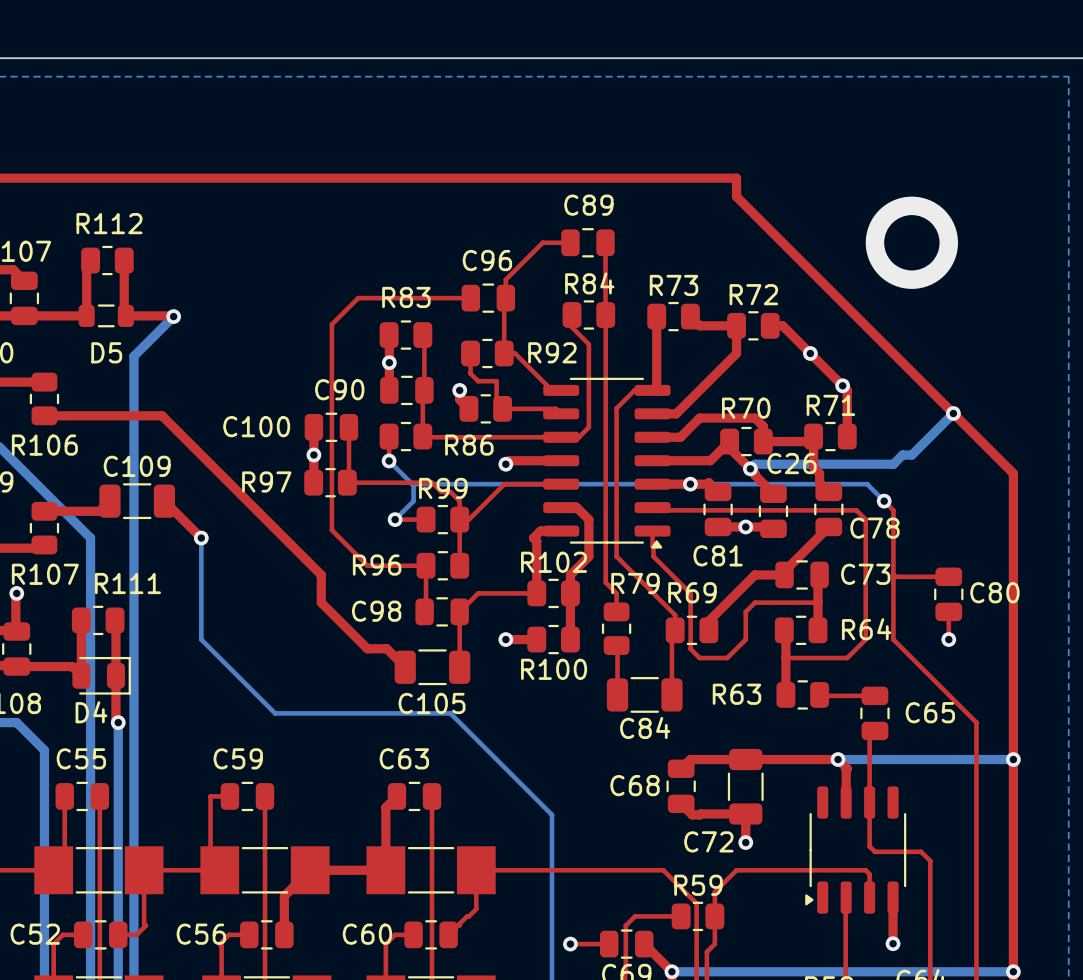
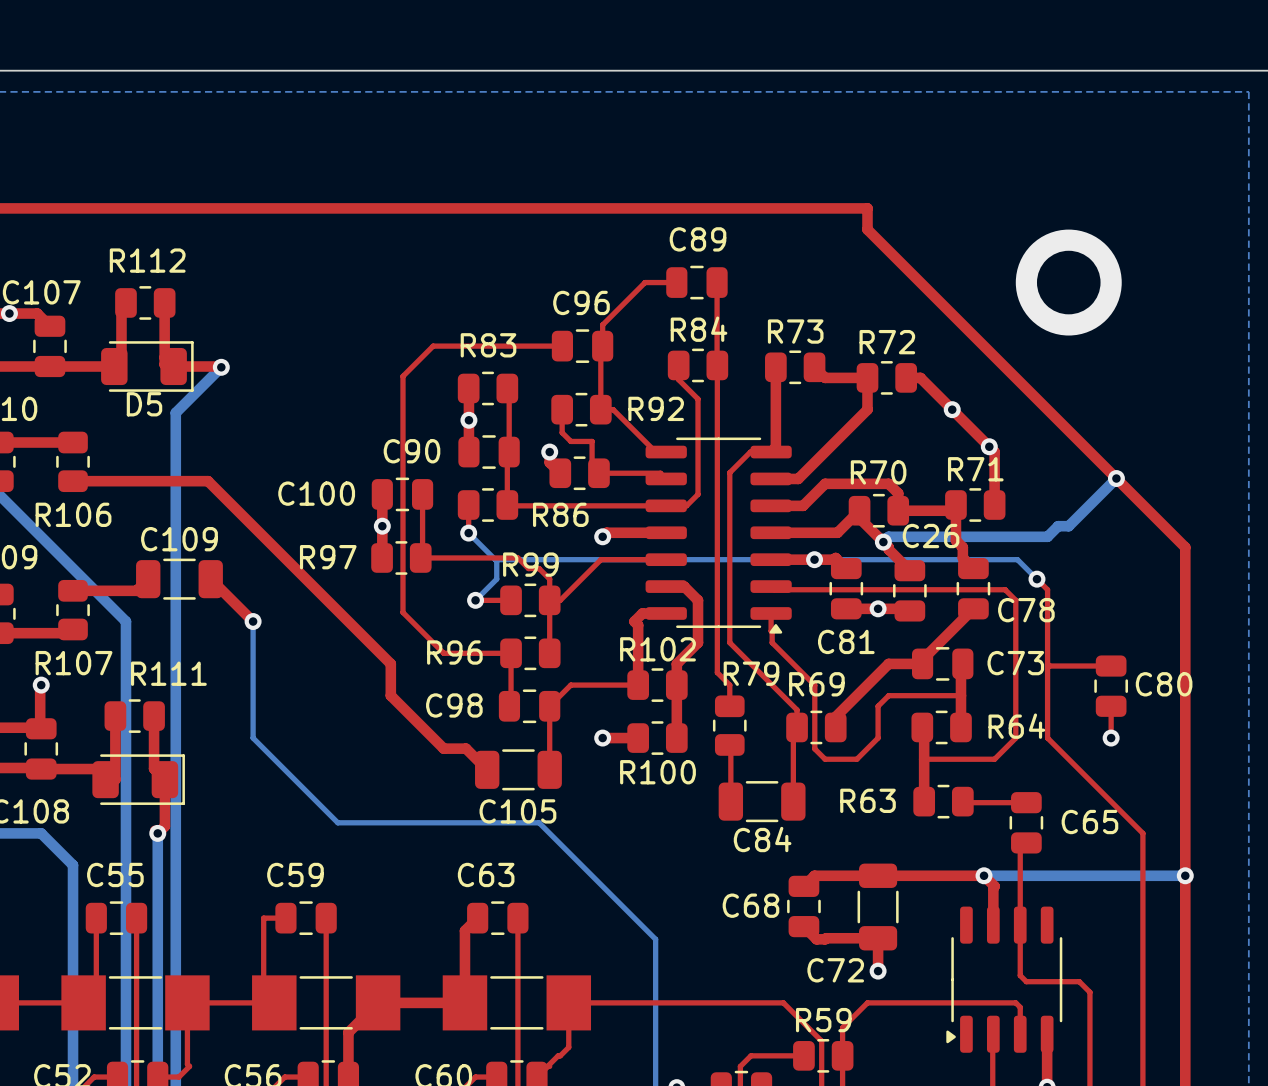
D5 footprint: [78, 304, 134, 328] -> [101, 341, 194, 392]
top track: none -> (154, 716) (154, 768) (164, 779) (164, 826) (157, 833)
top track: (115, 621) (115, 720) -> none
D4: (101, 675) -> none
part: none -> (138, 779)

